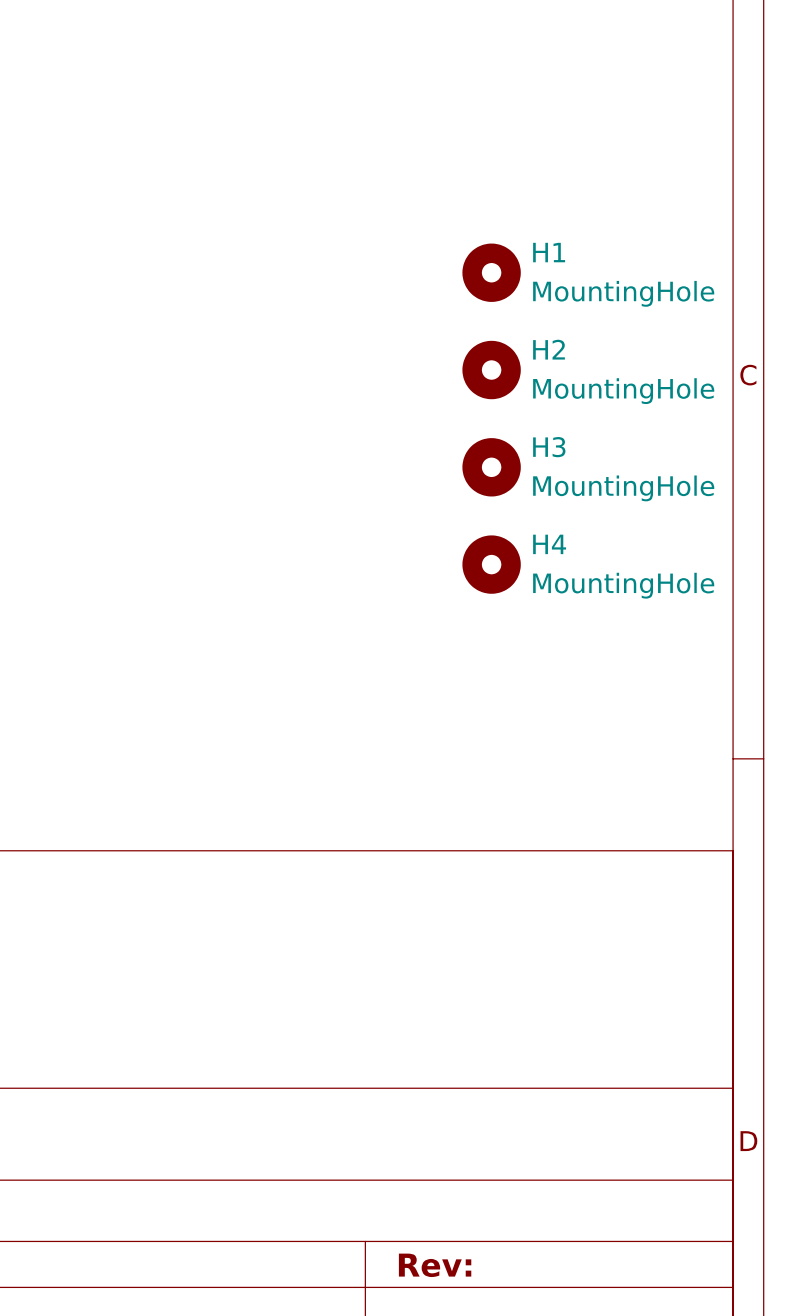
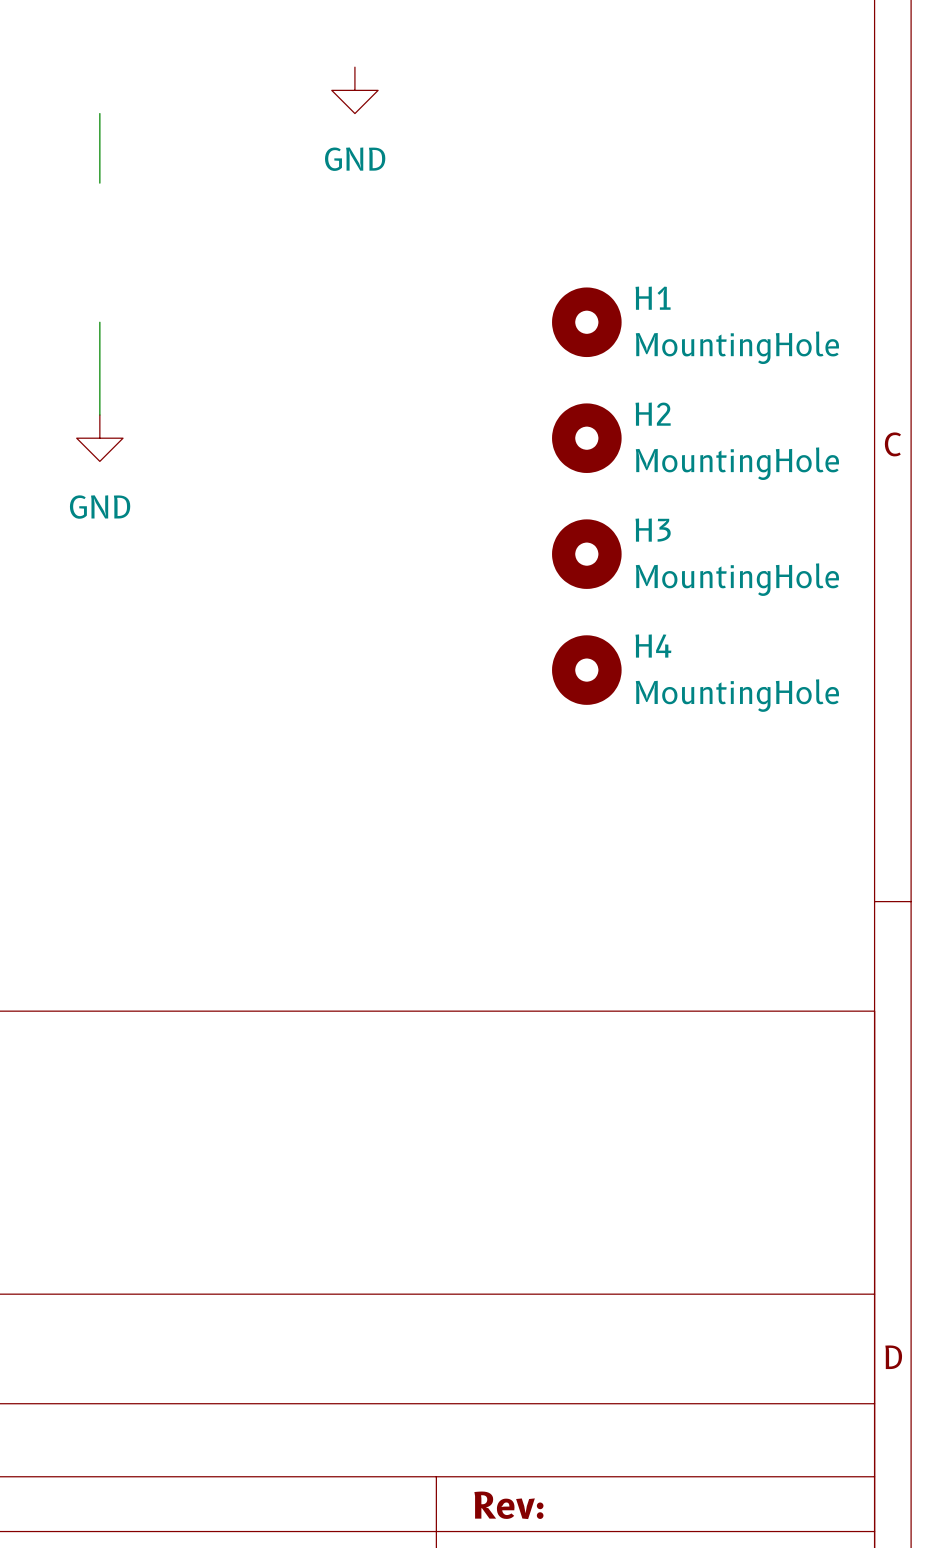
power symbol: none -> GND (354, 90)
wire: none -> (99, 113) (99, 183)
wire: none -> (99, 322) (99, 415)
power symbol: none -> GND (99, 438)

